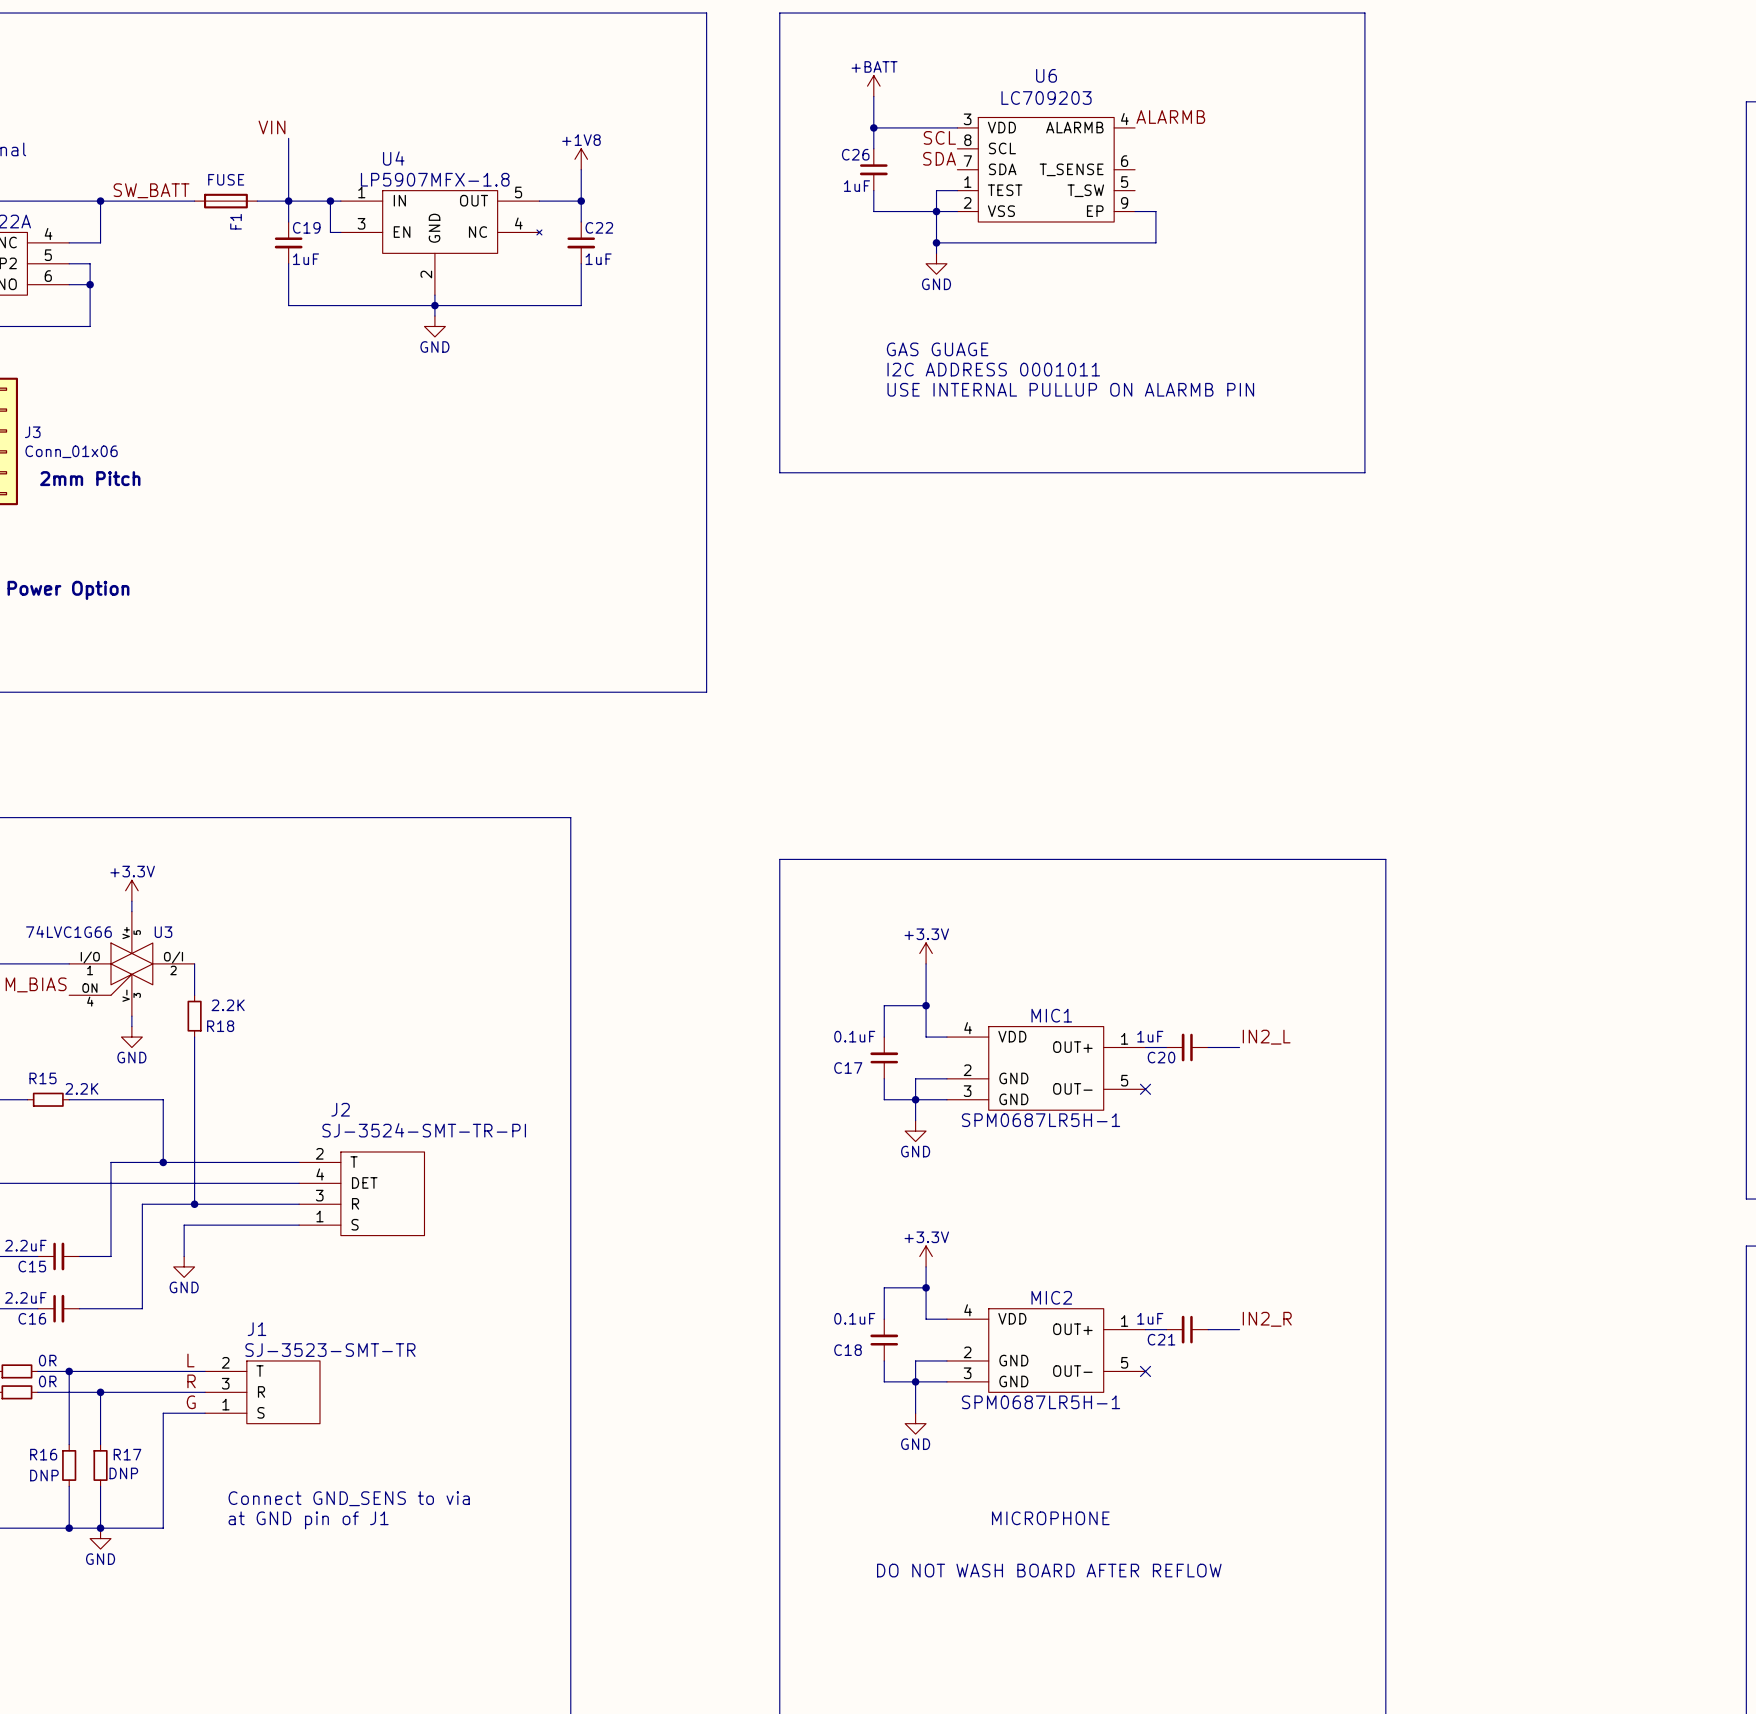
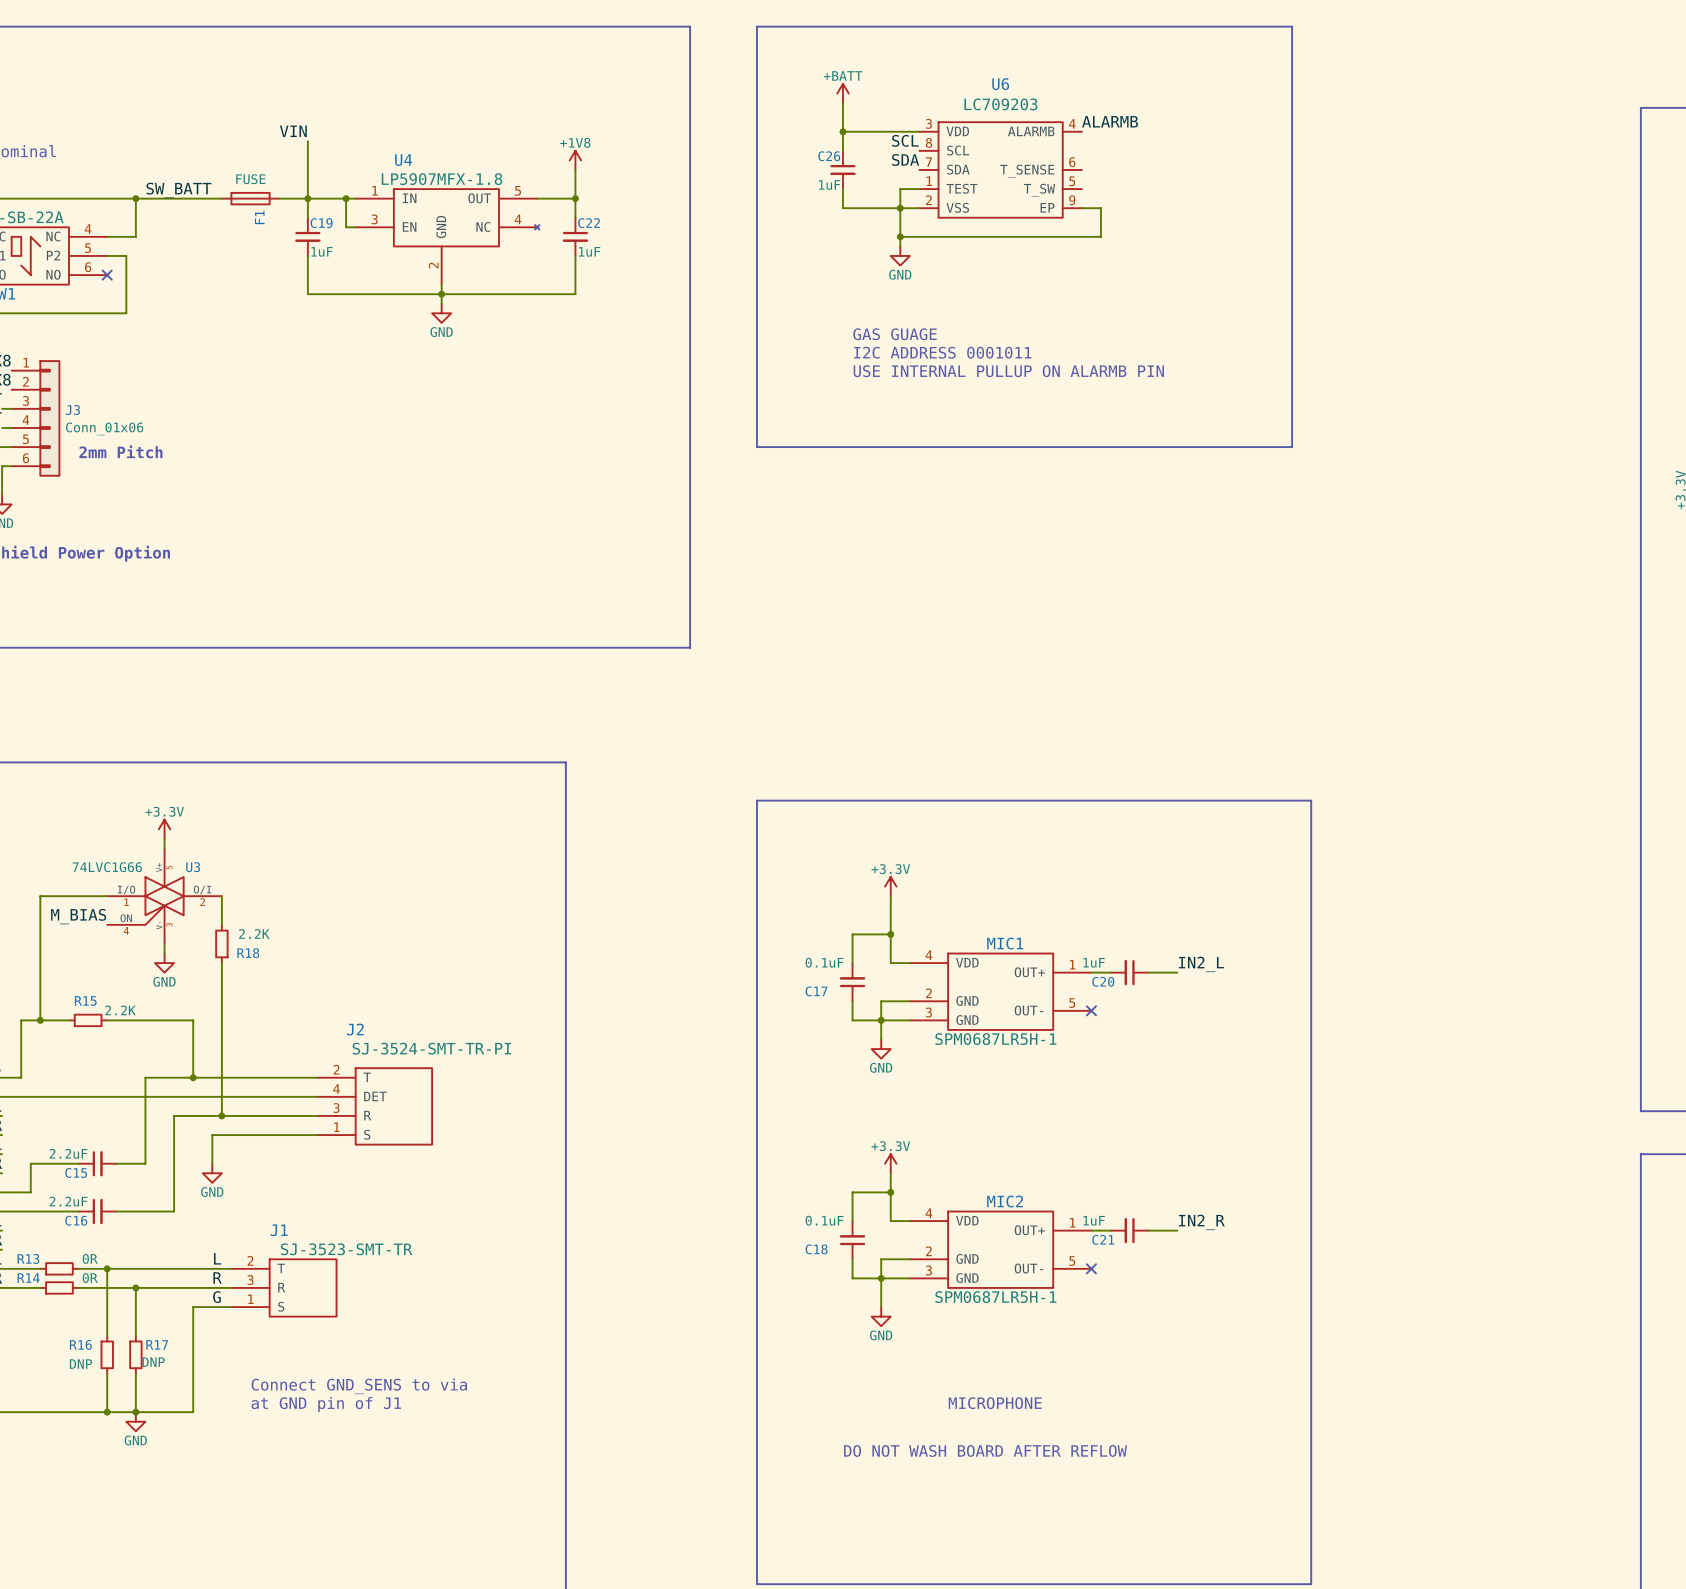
wire: (69, 284) (90, 284) -> none
no-connect mark: none -> (107, 275)
junction: (90, 284) -> none

